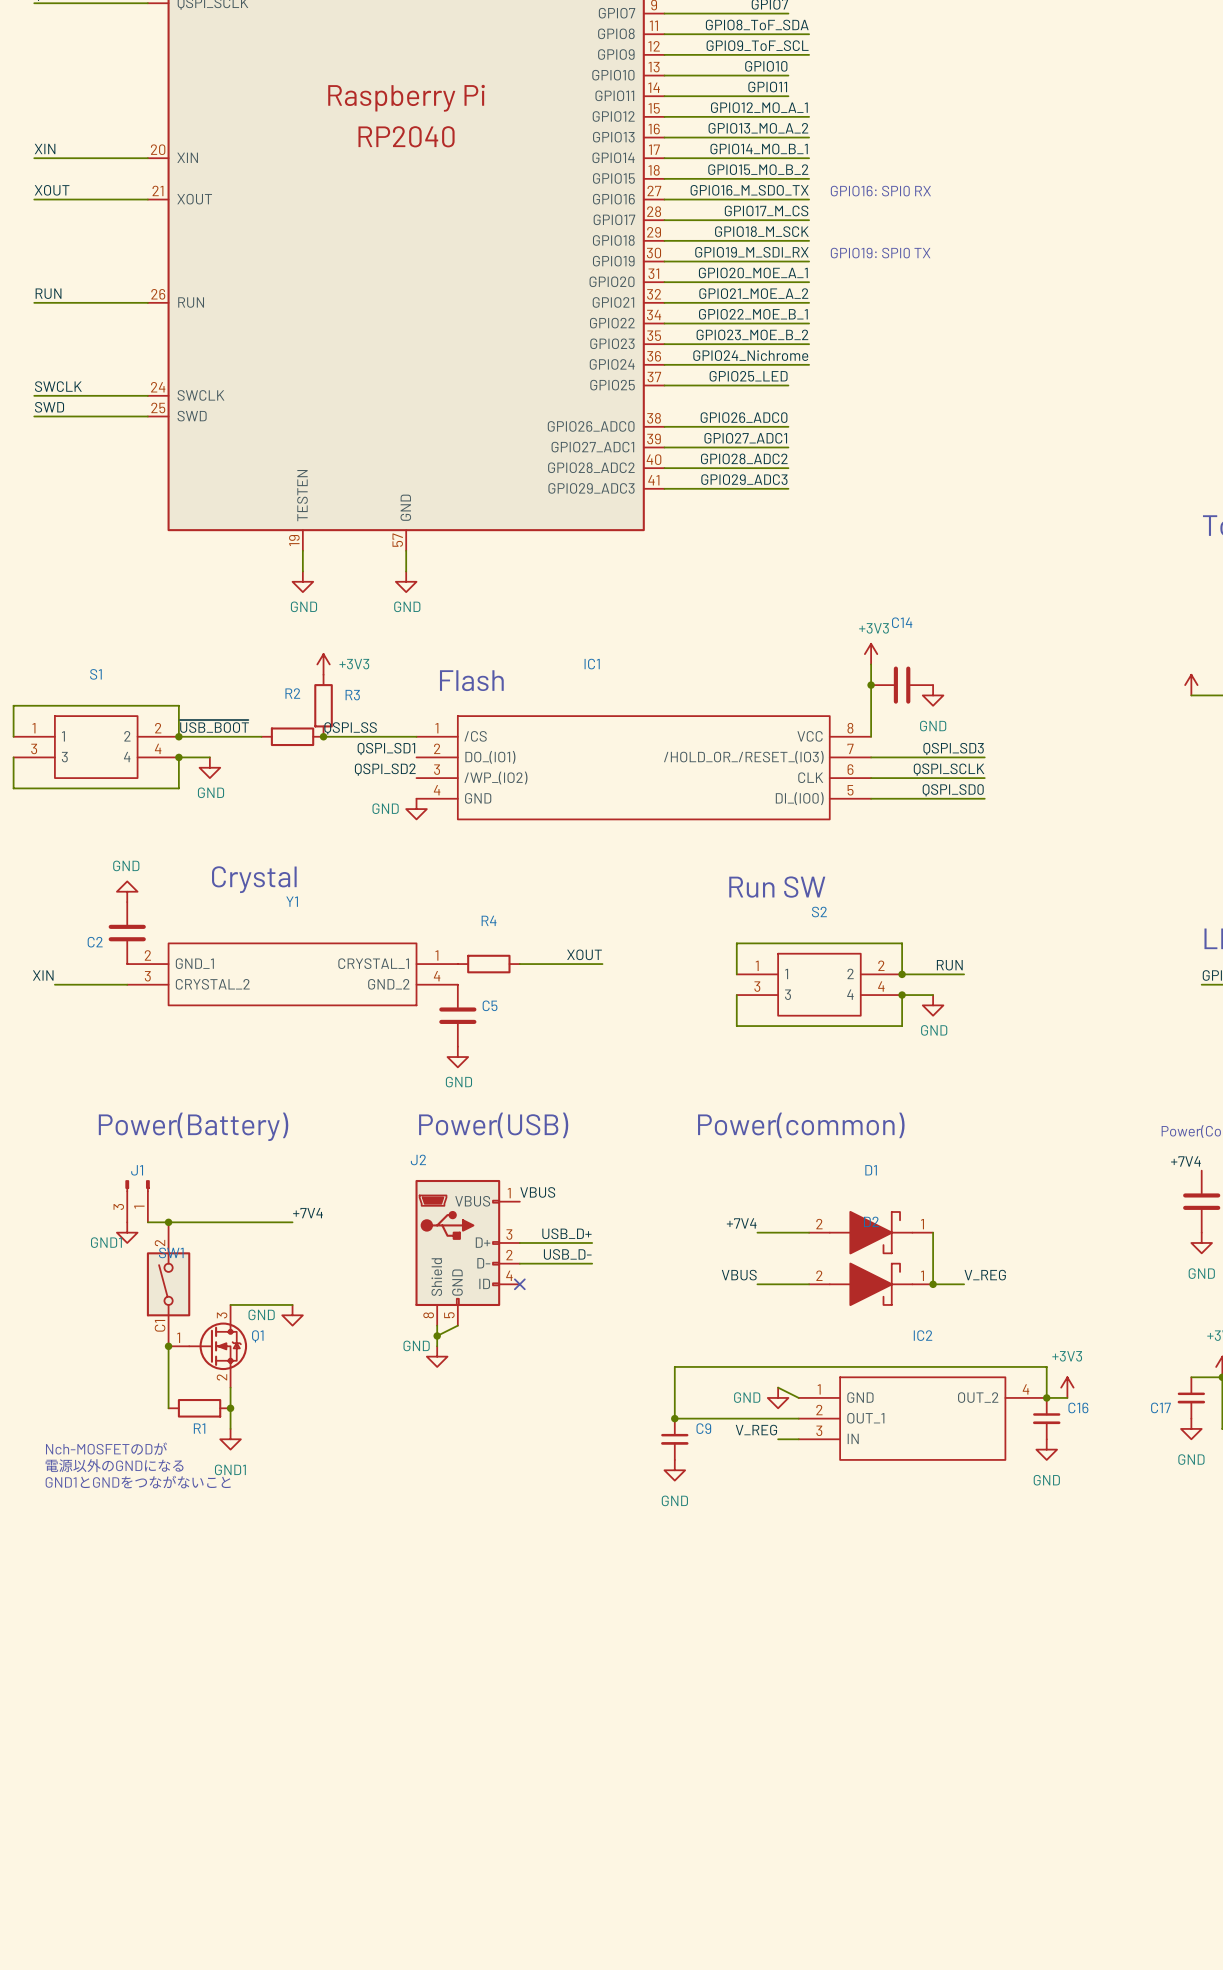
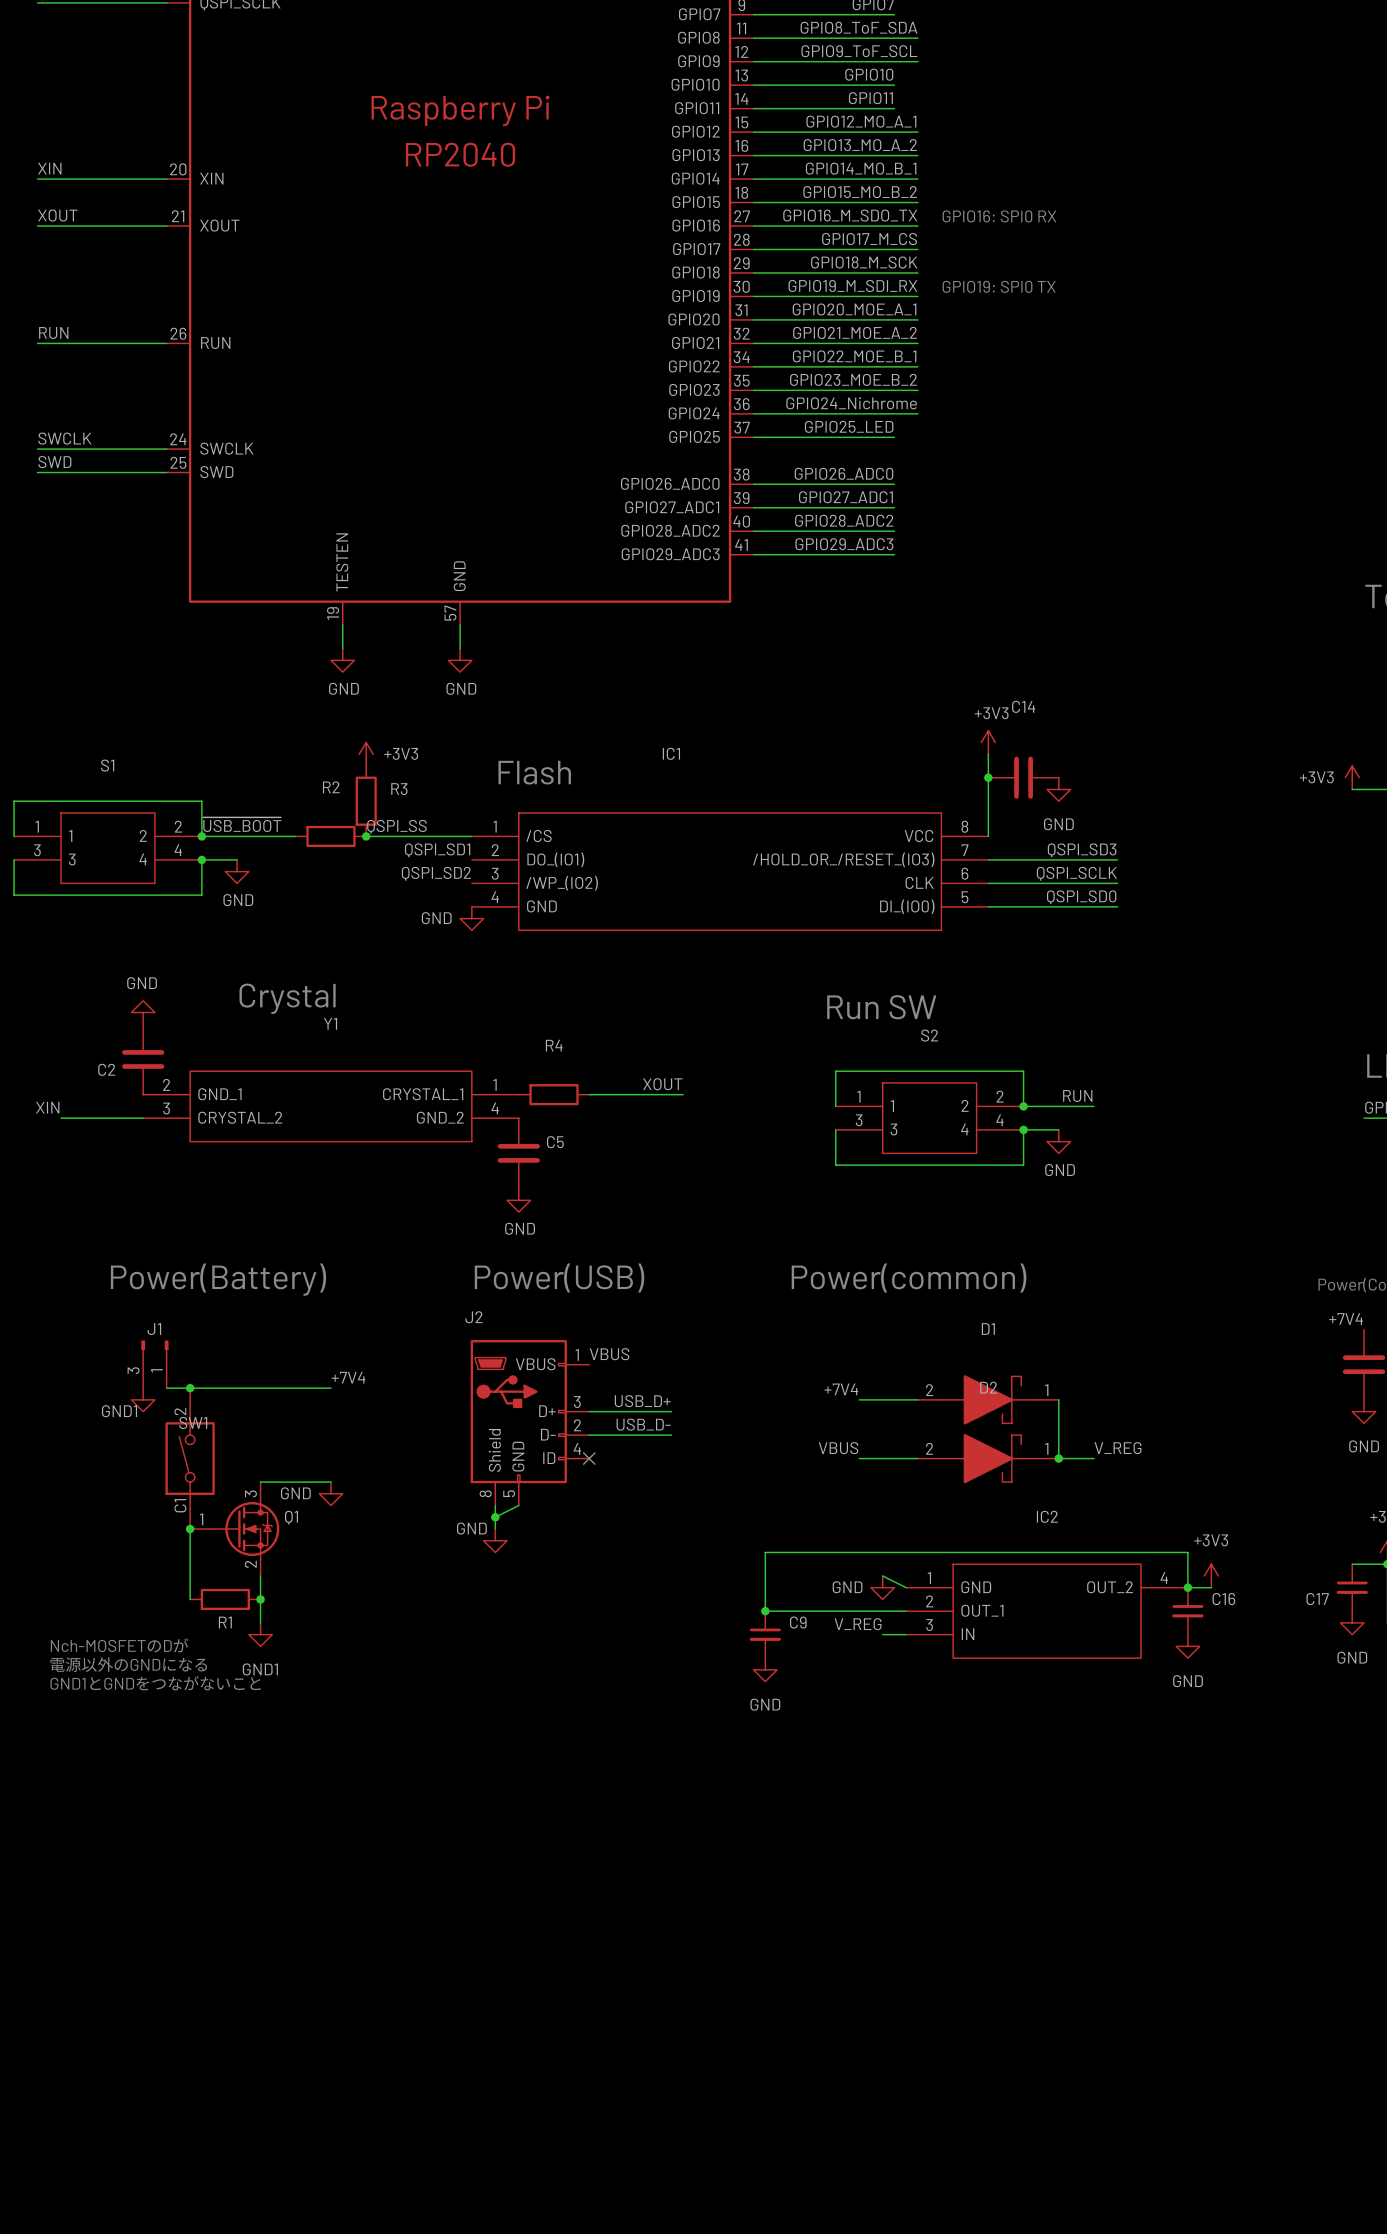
power symbol text: none -> +3V3 (1316, 777)

